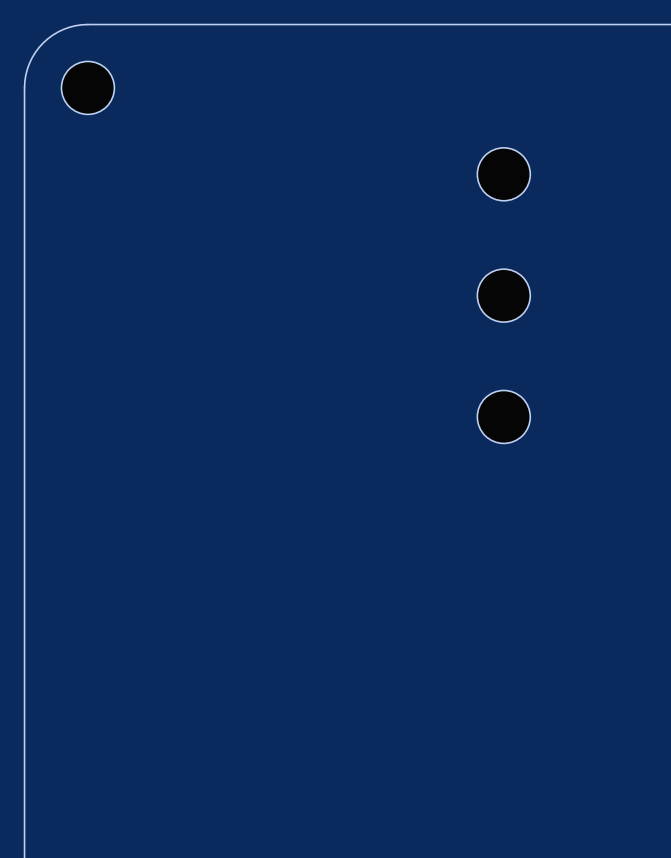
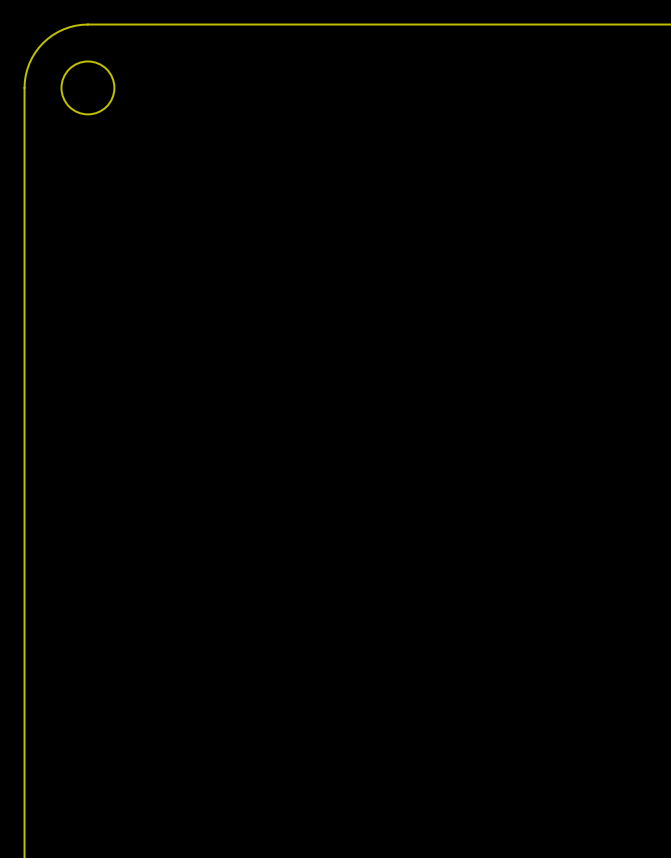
part: (503, 174) -> none
part: (503, 295) -> none
part: (503, 416) -> none

